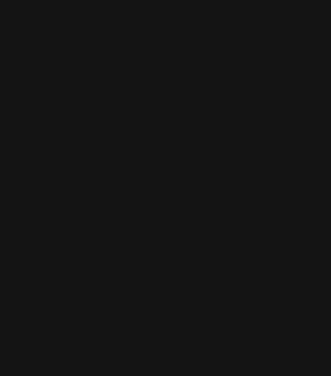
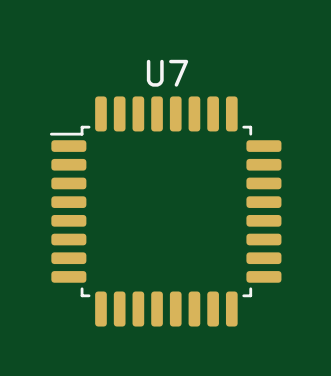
U7: none -> (165, 211)

